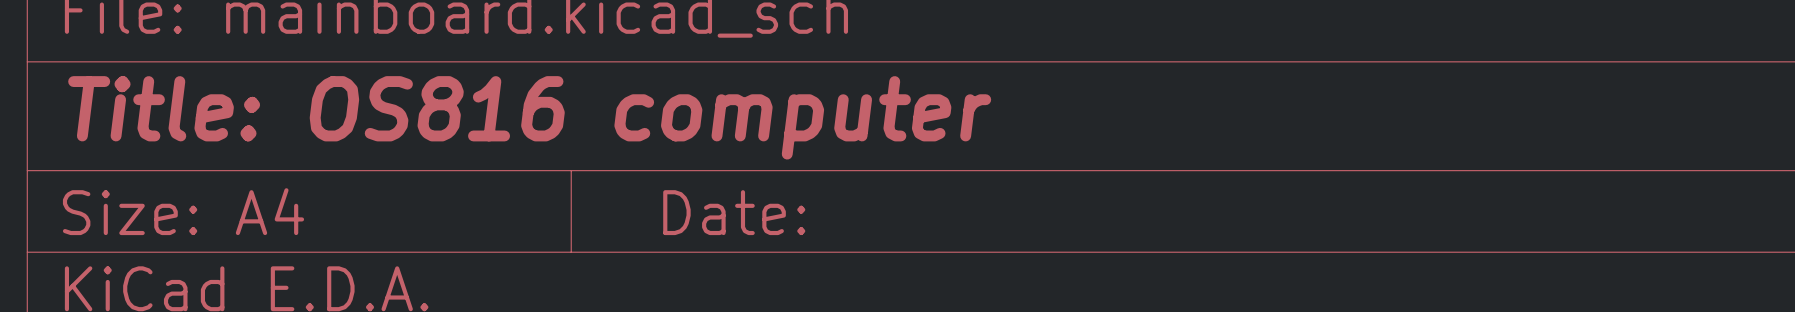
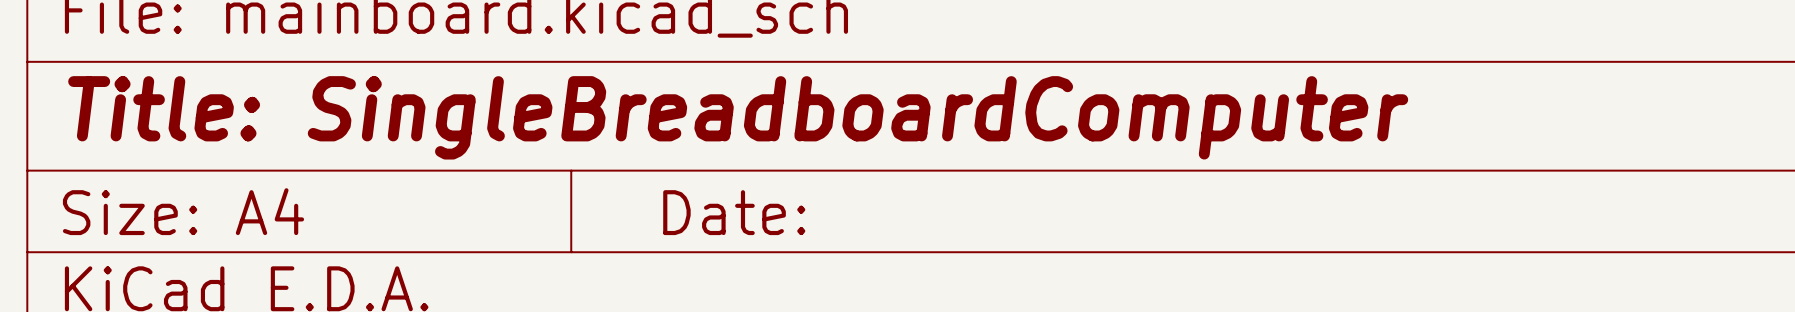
title block: Title: OS816 computer (529, 117) -> Title: SingleBreadboardComputer (738, 117)

